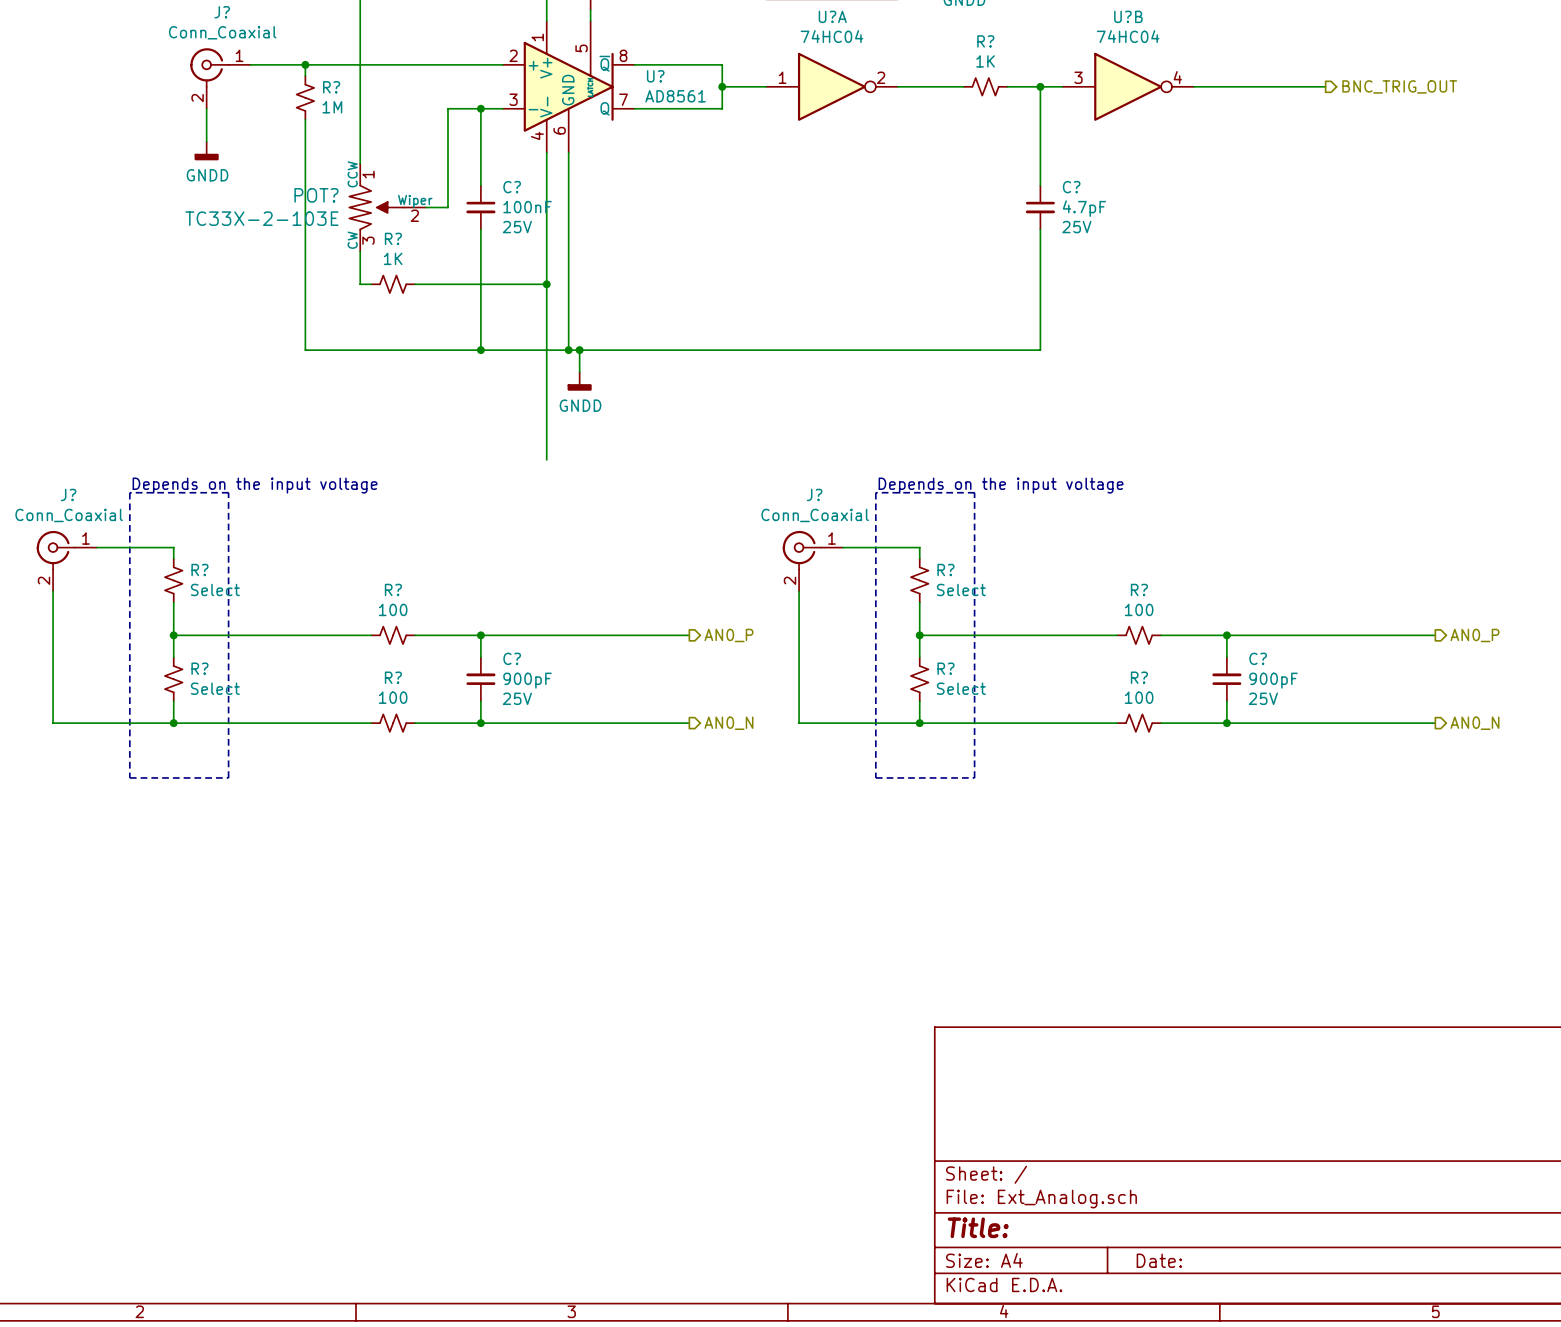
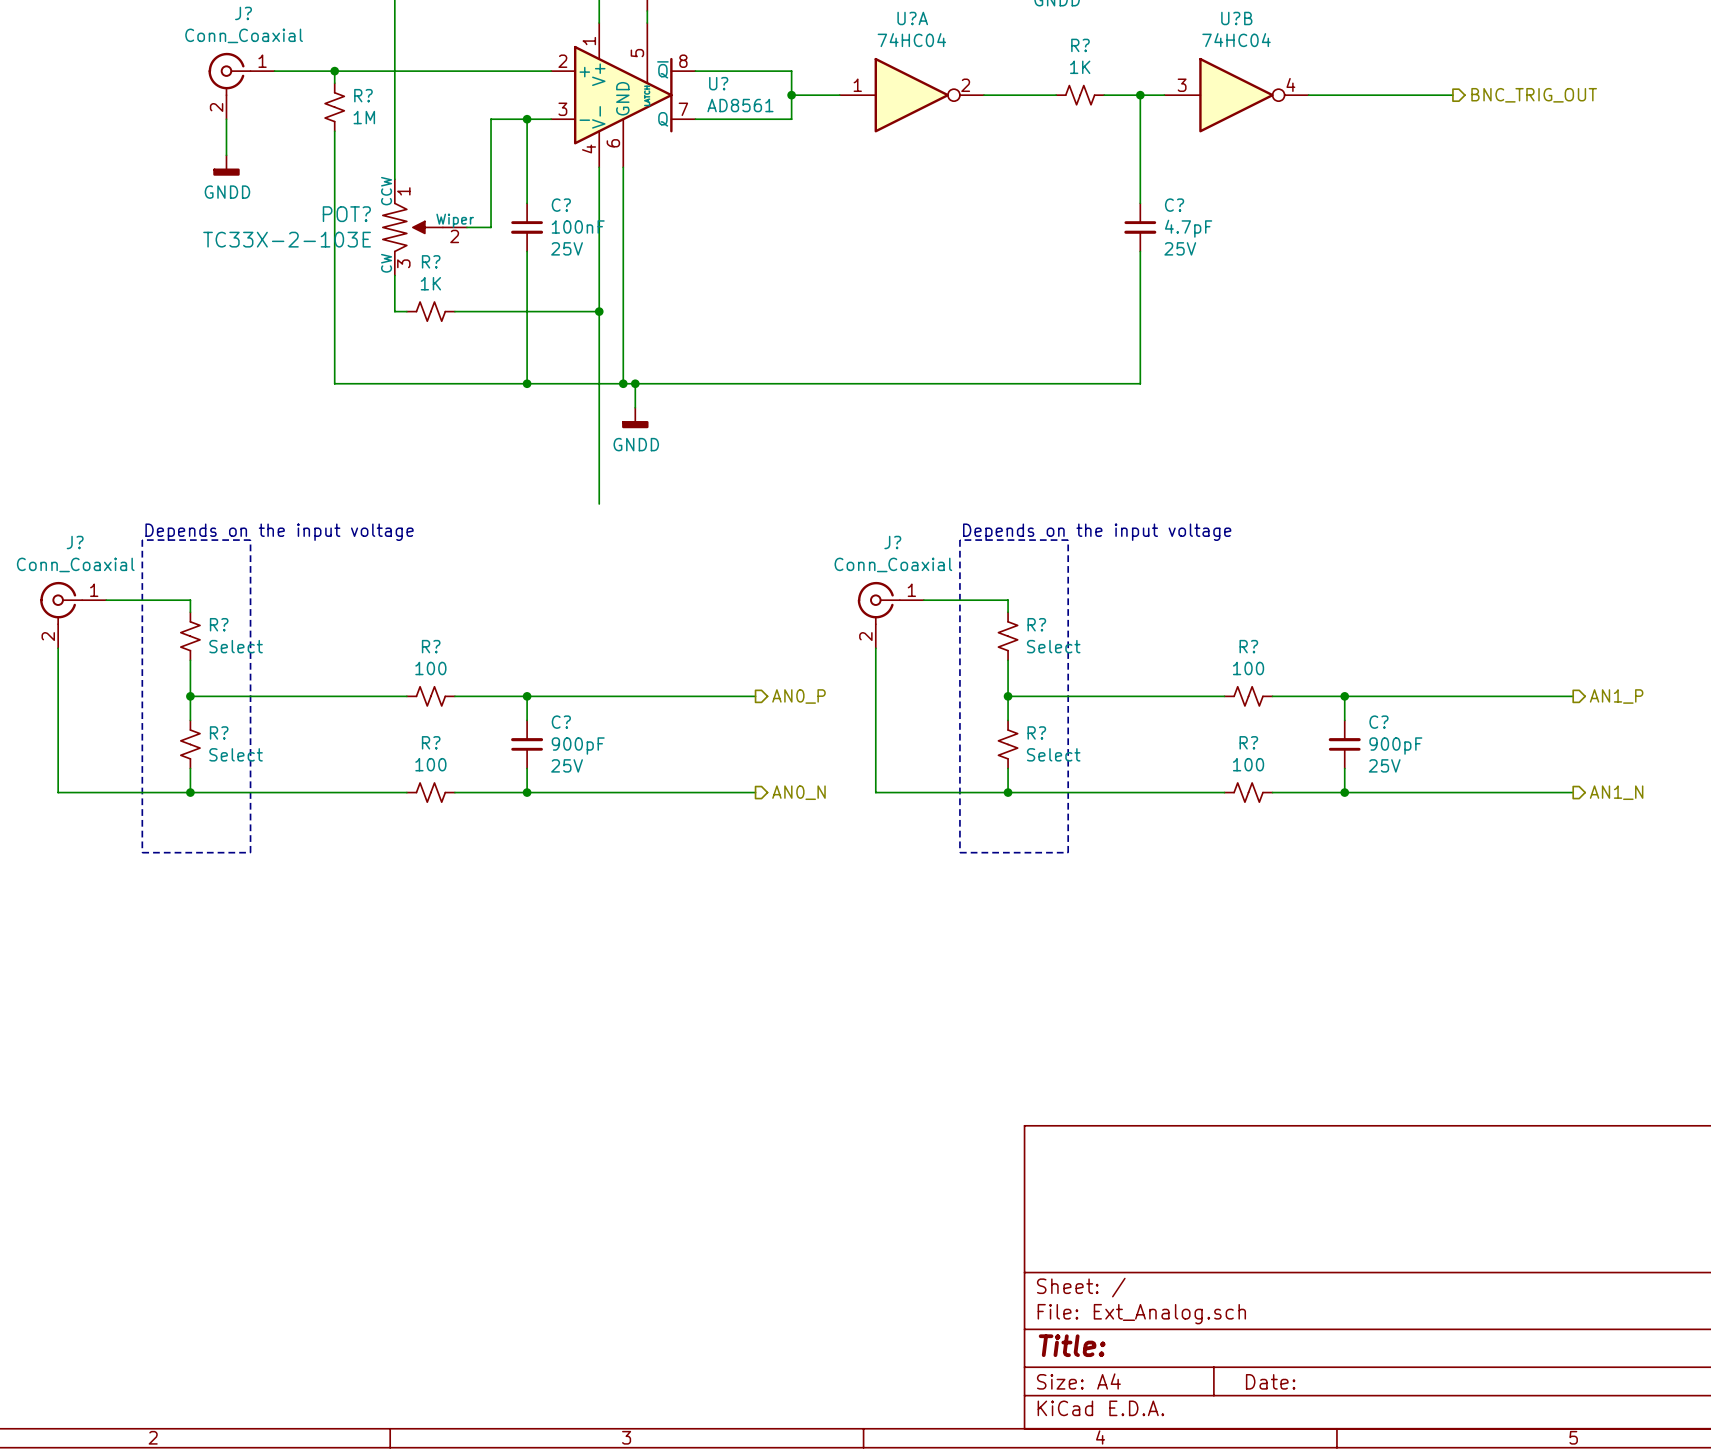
hierarchical label: AN0_P (1474, 635) -> AN1_P (1616, 696)
hierarchical label: AN0_N (1474, 723) -> AN1_N (1616, 792)

